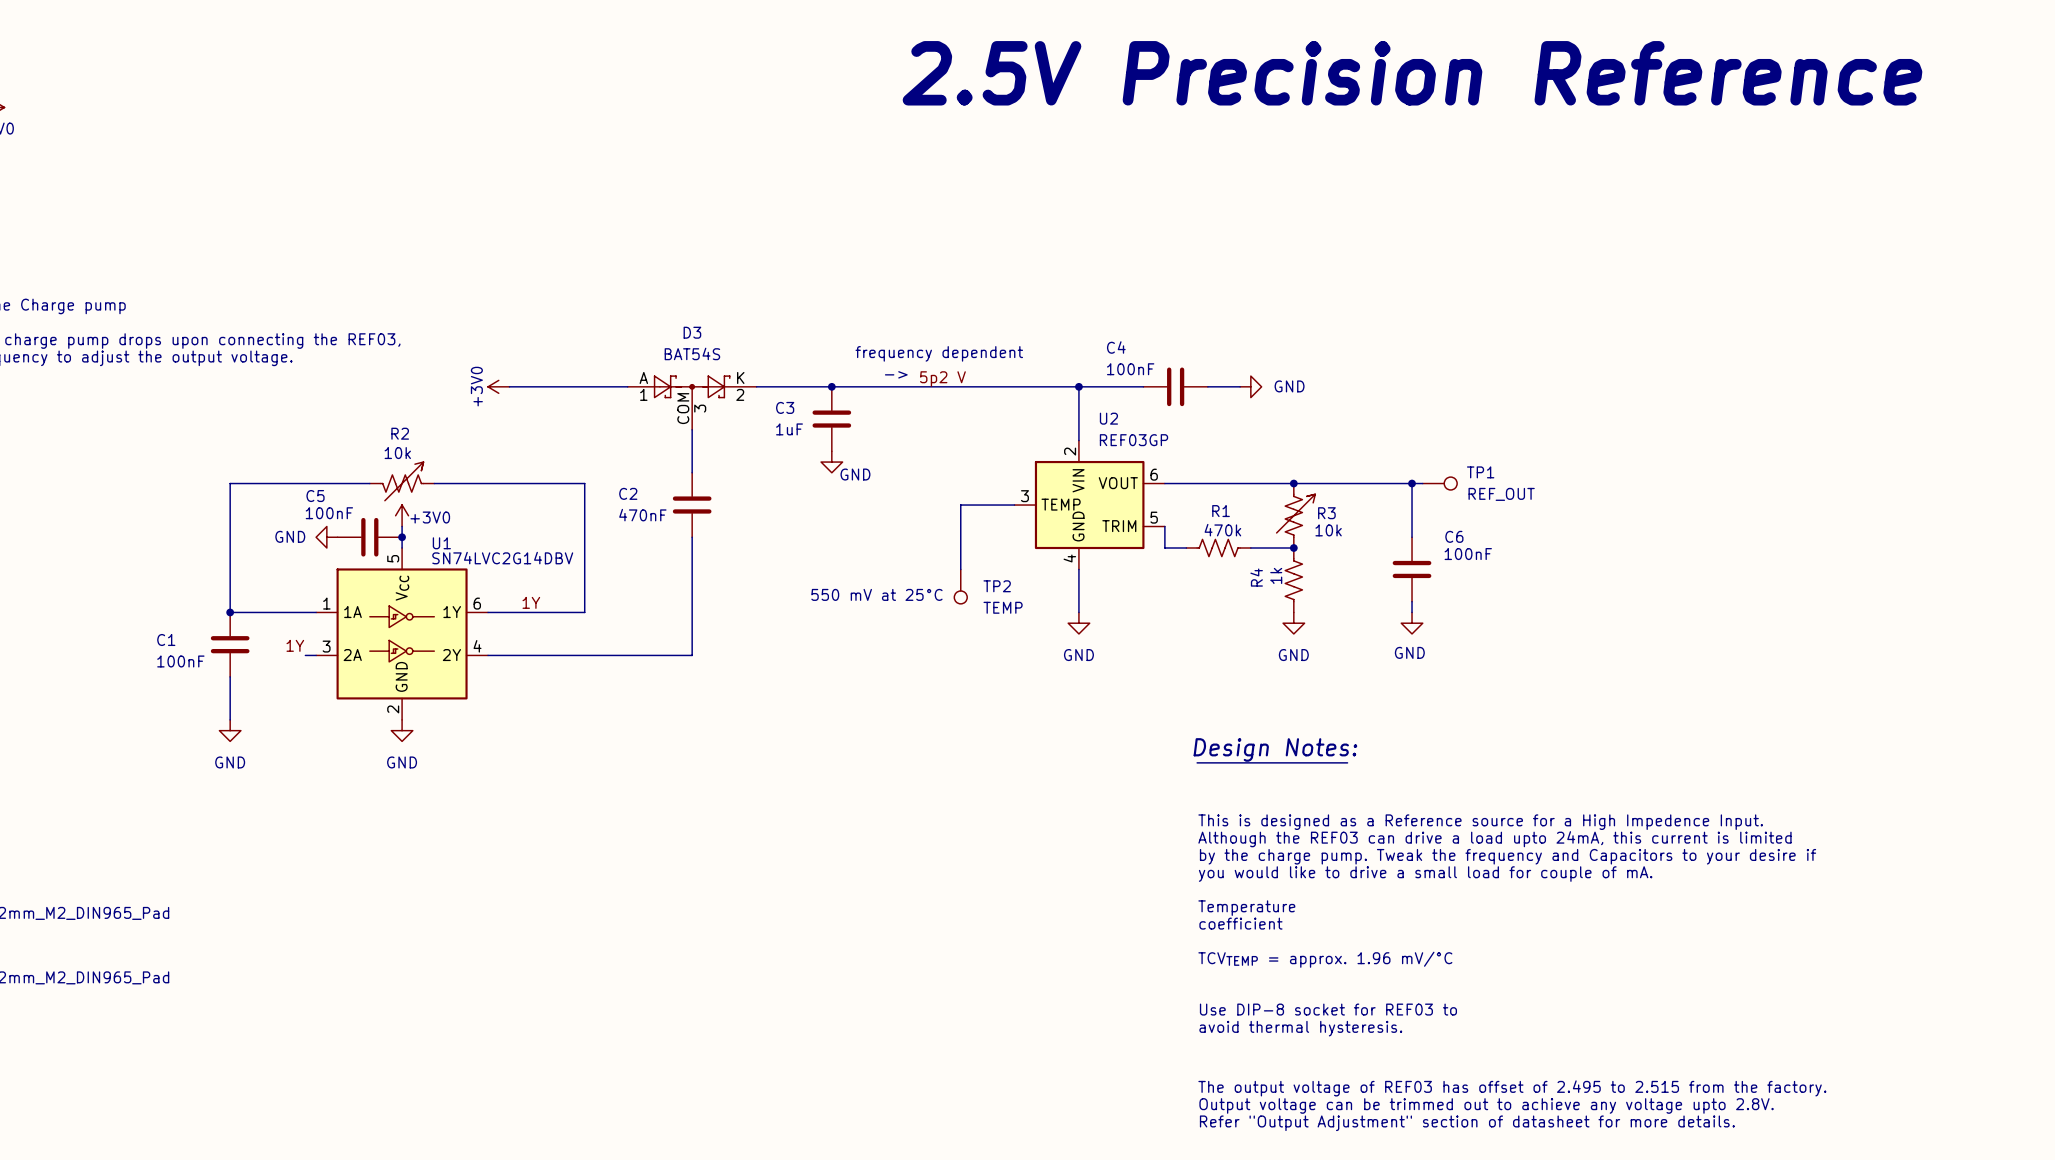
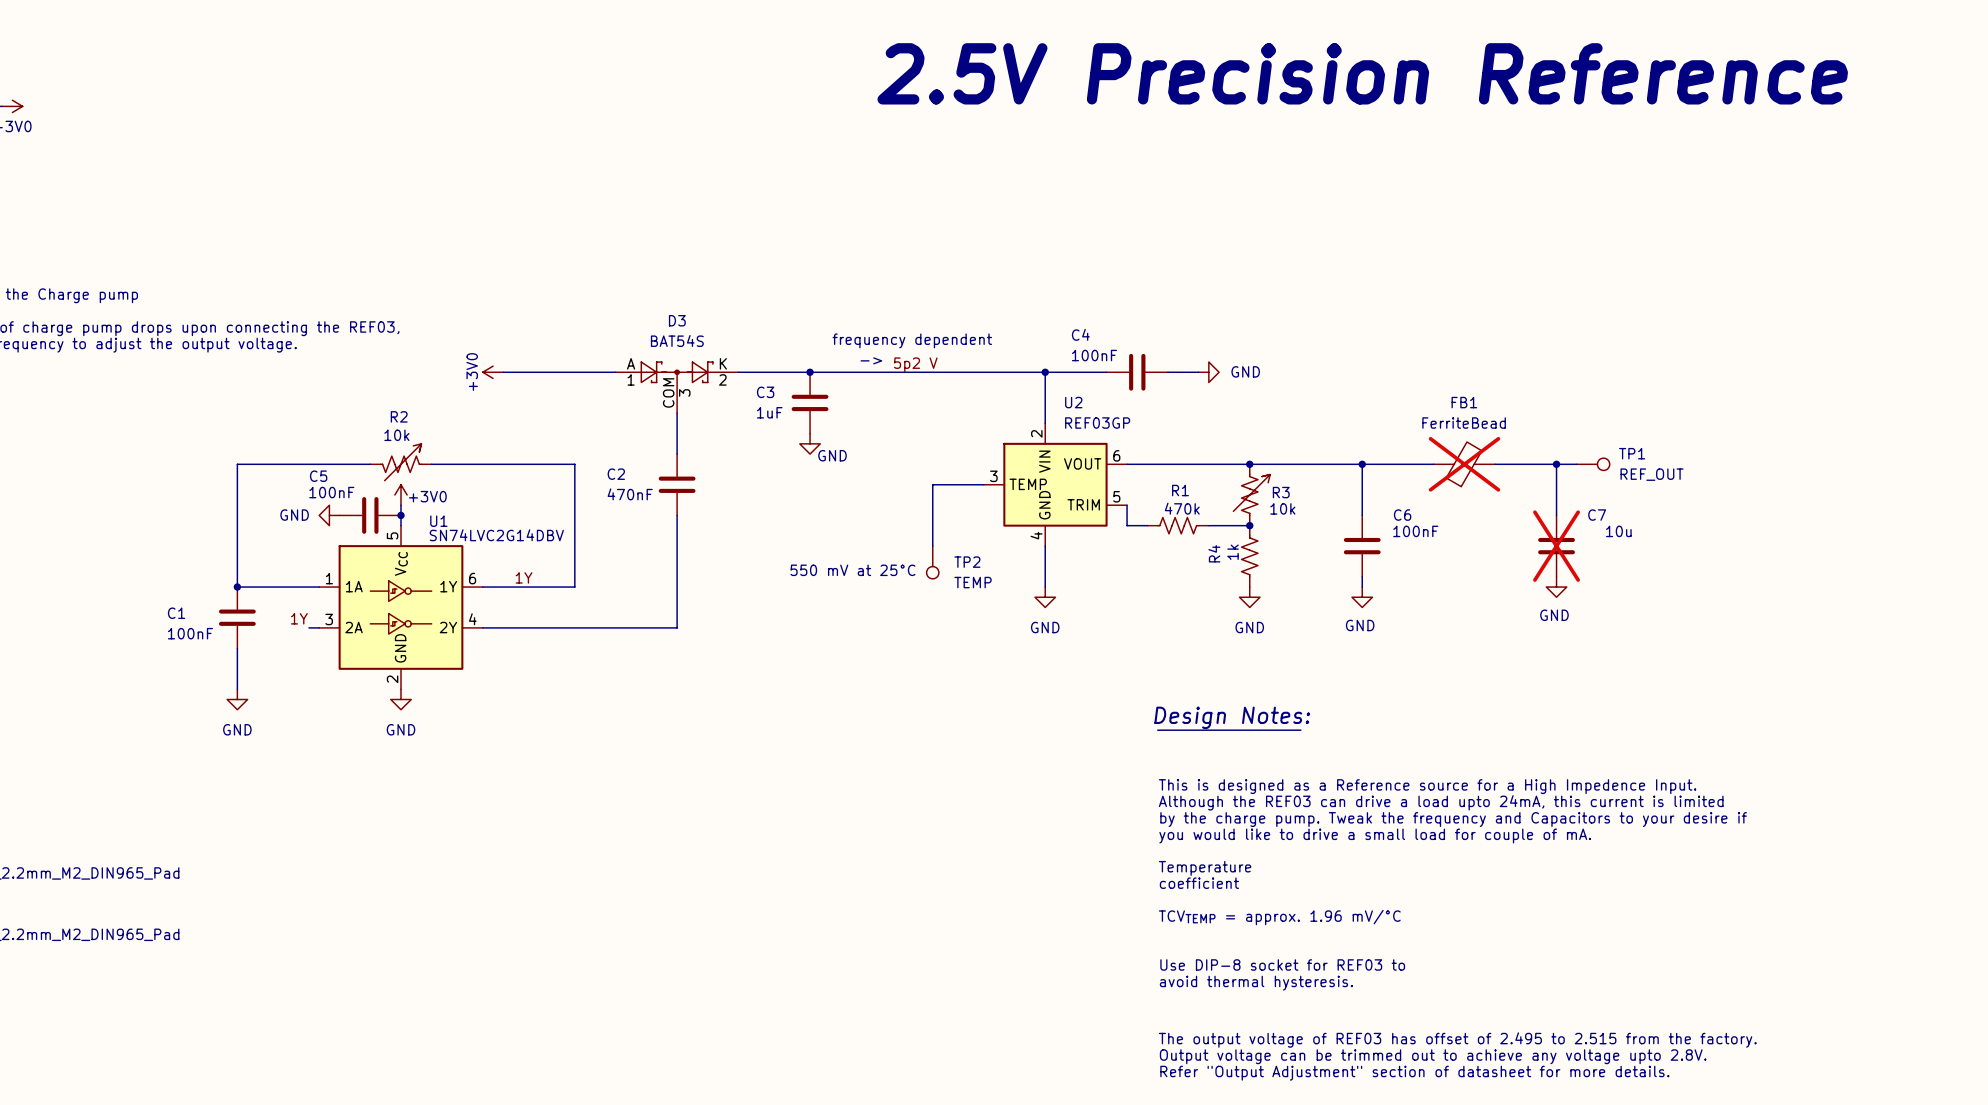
wire: none -> (1372, 464) (1433, 464)
TP1 position: (1439, 483) -> (1593, 464)
FB1: none -> FerriteBead (1464, 464)
wire: none -> (1495, 464) (1576, 464)
wire: none -> (1556, 464) (1556, 515)
junction: none -> (1556, 464)
C7: none -> 10u (1556, 546)
power symbol: none -> GND (1556, 587)

